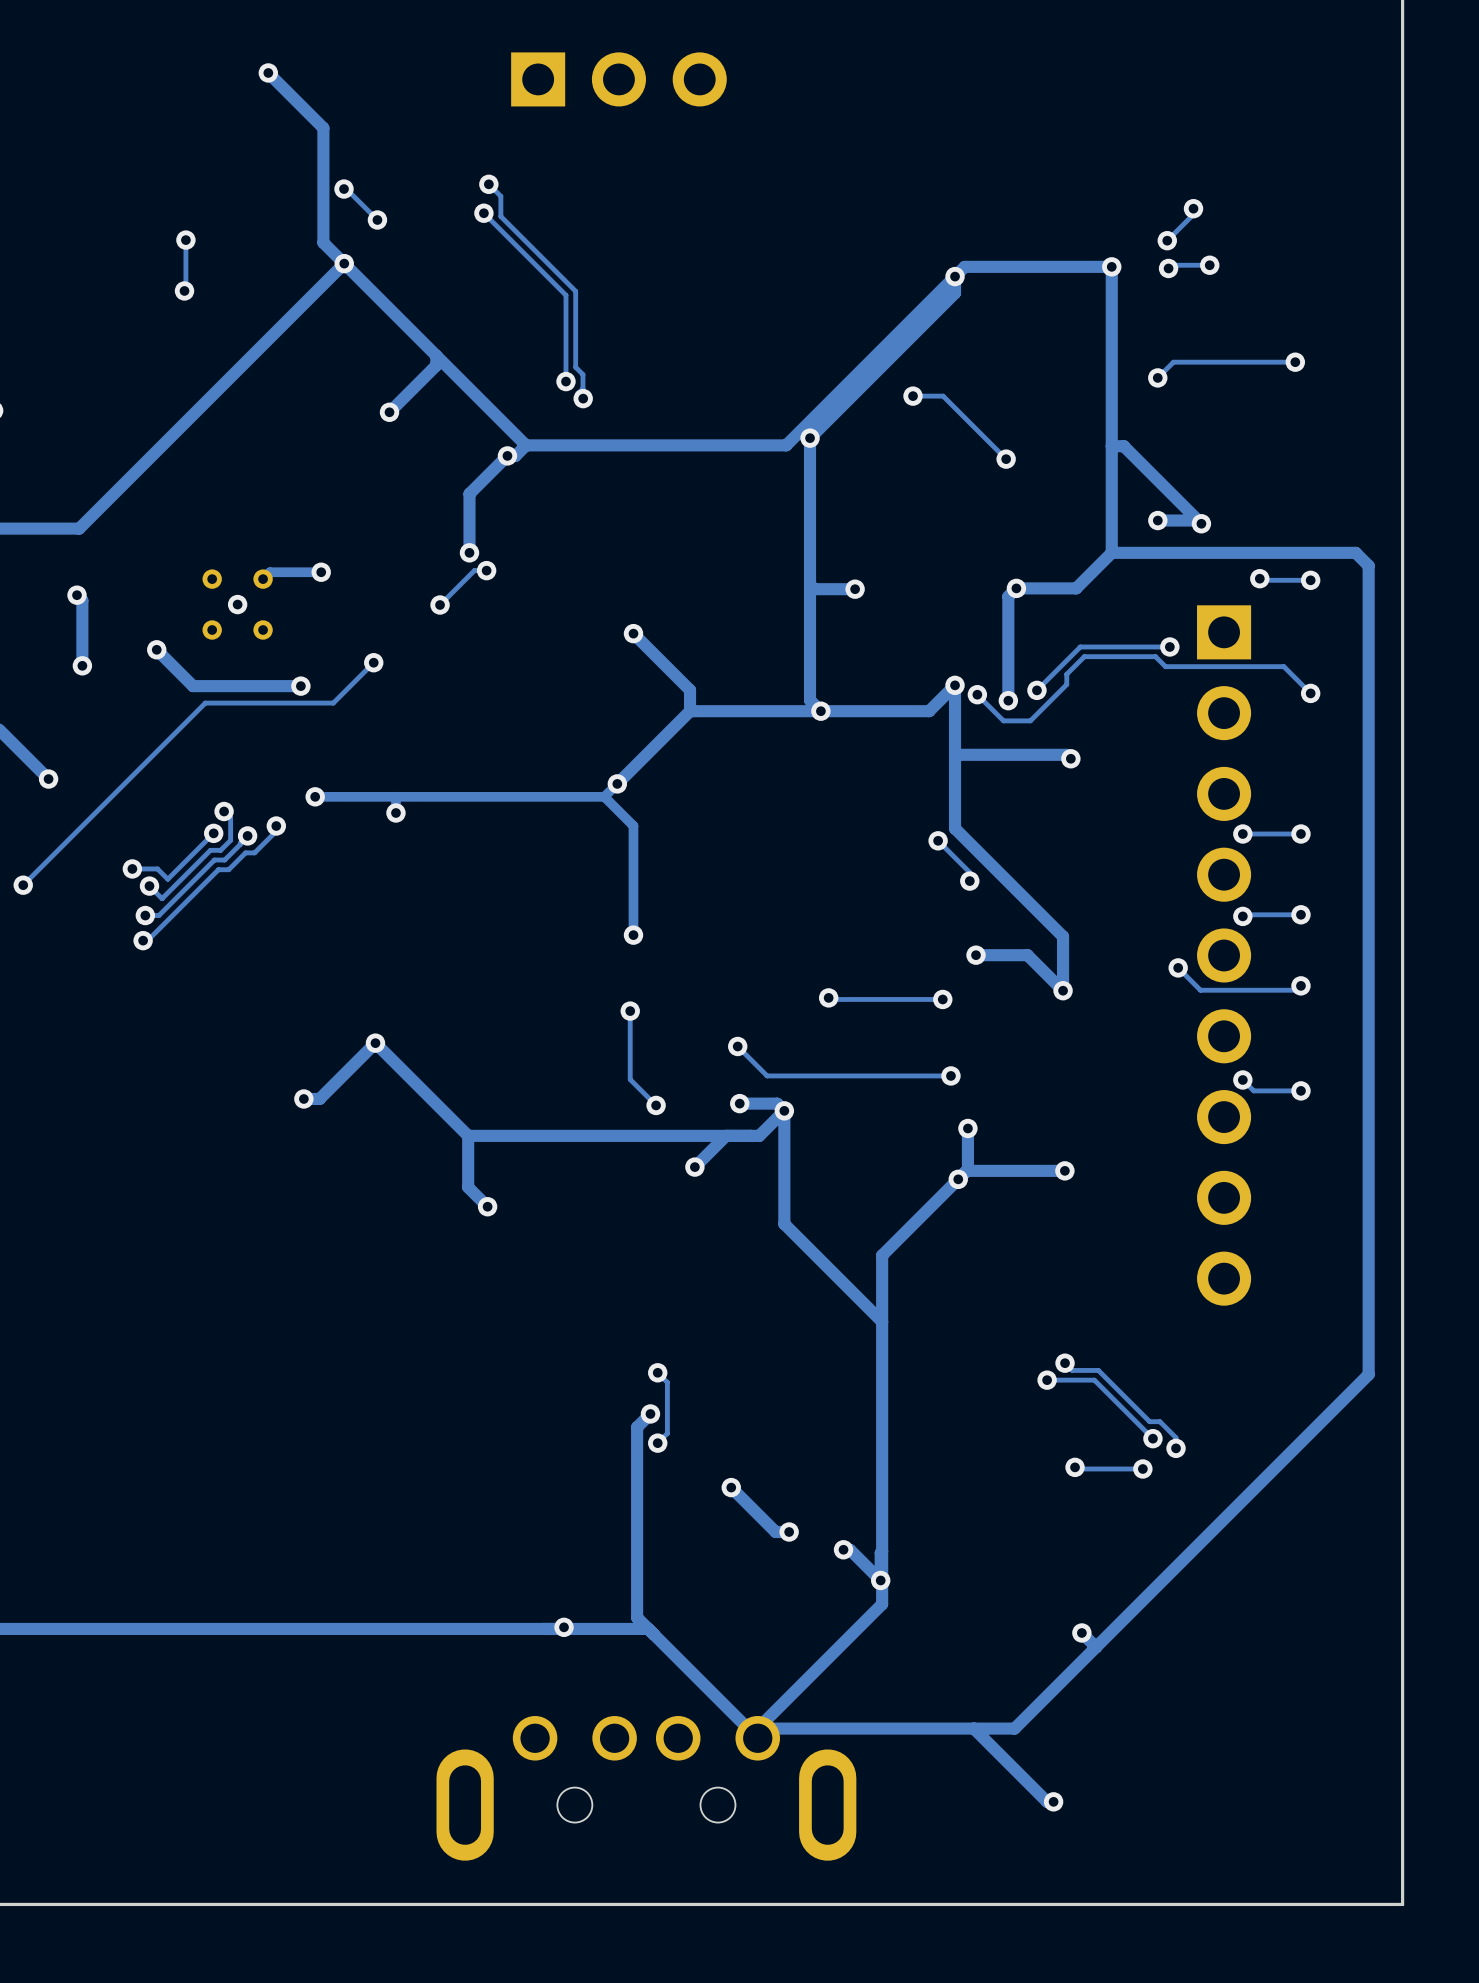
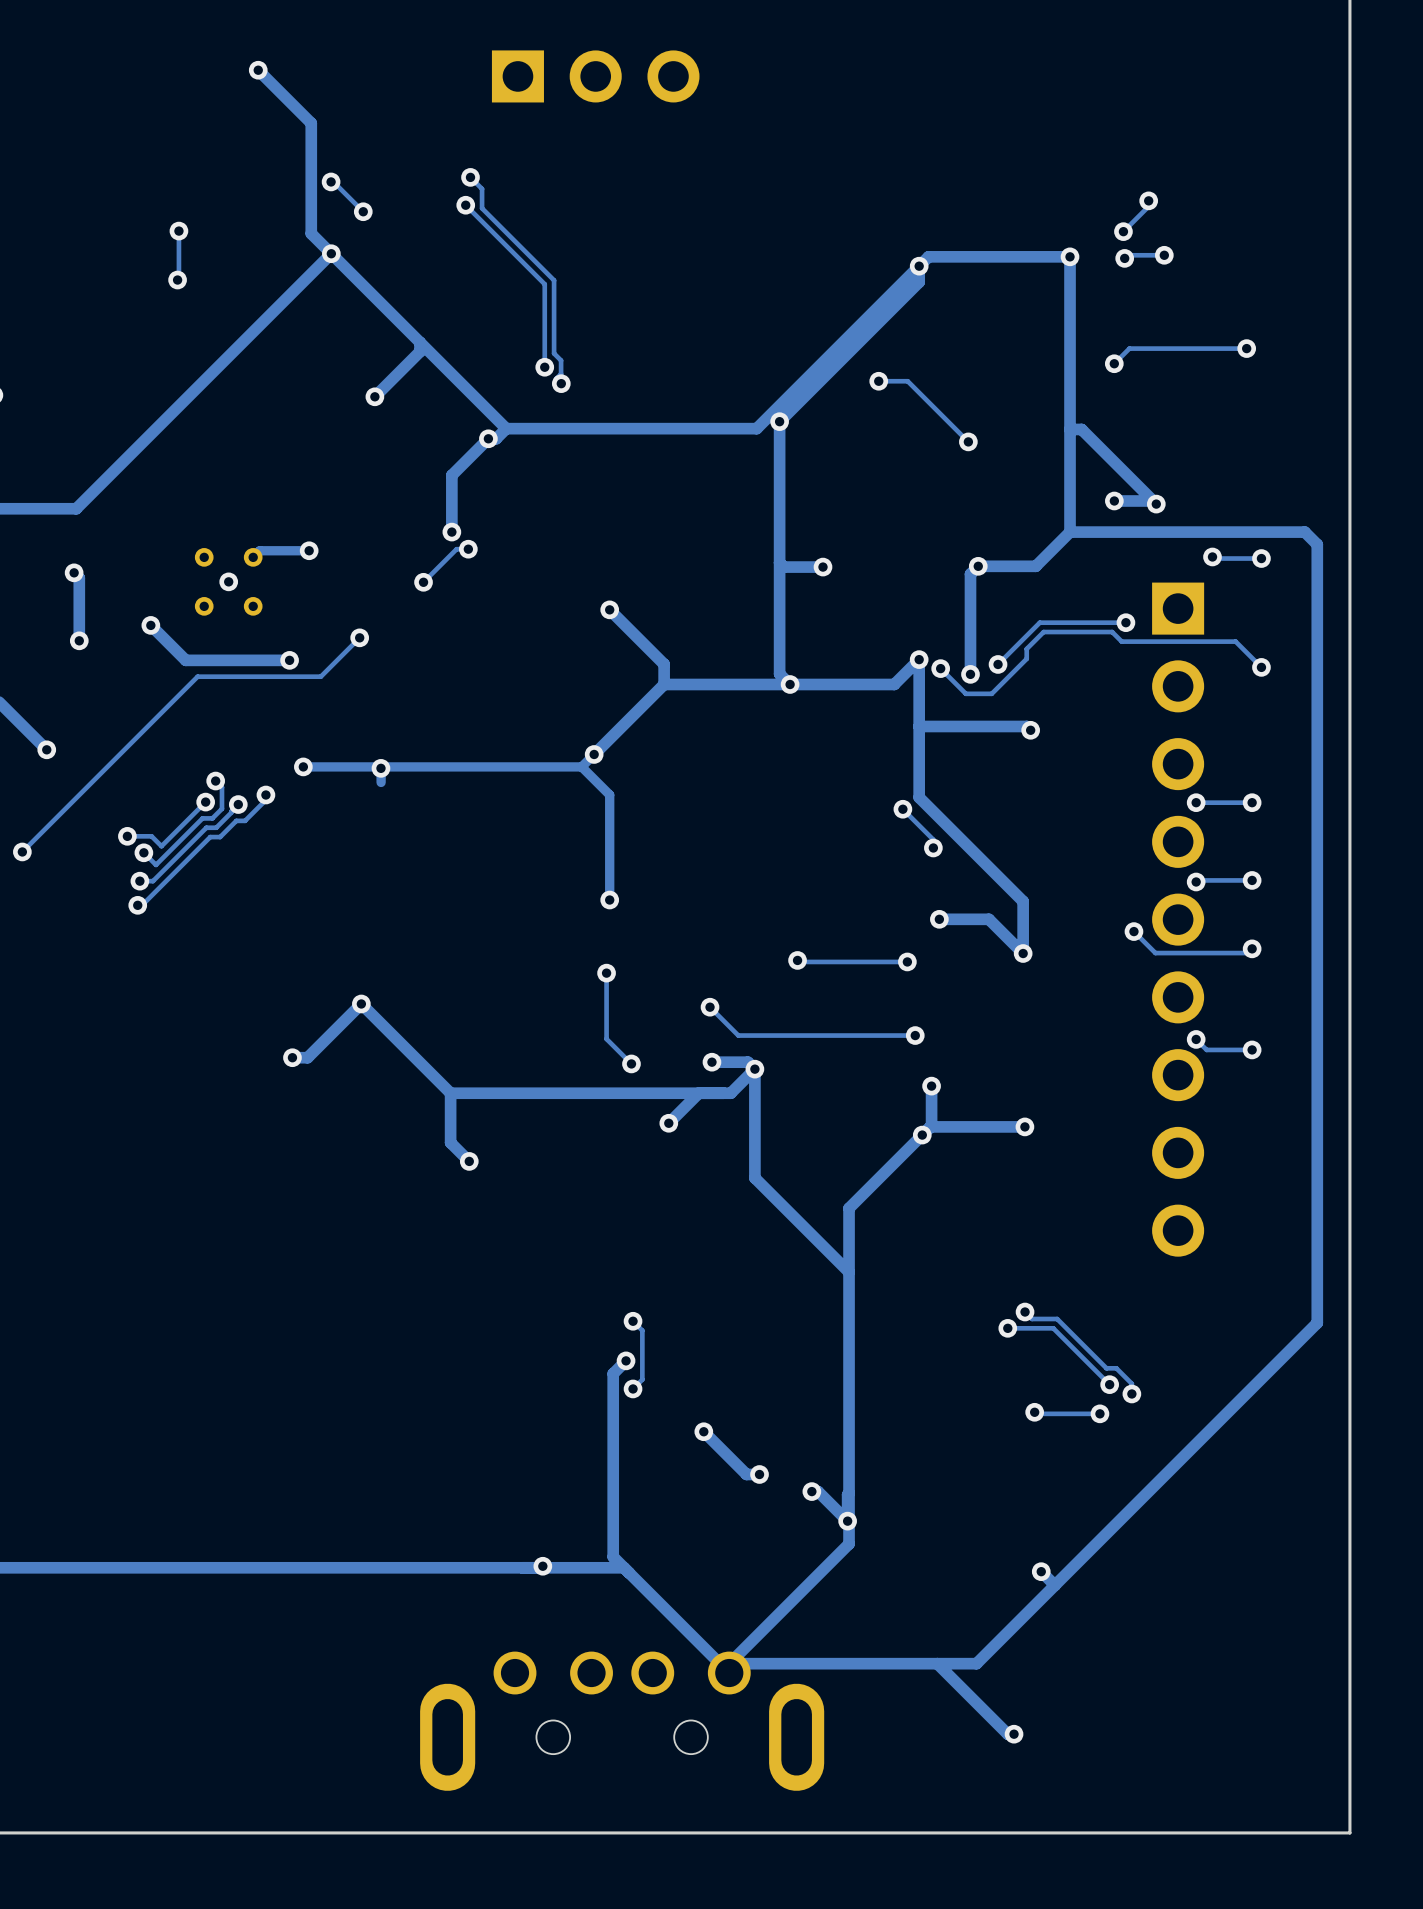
via position: (395, 812) -> (380, 768)

